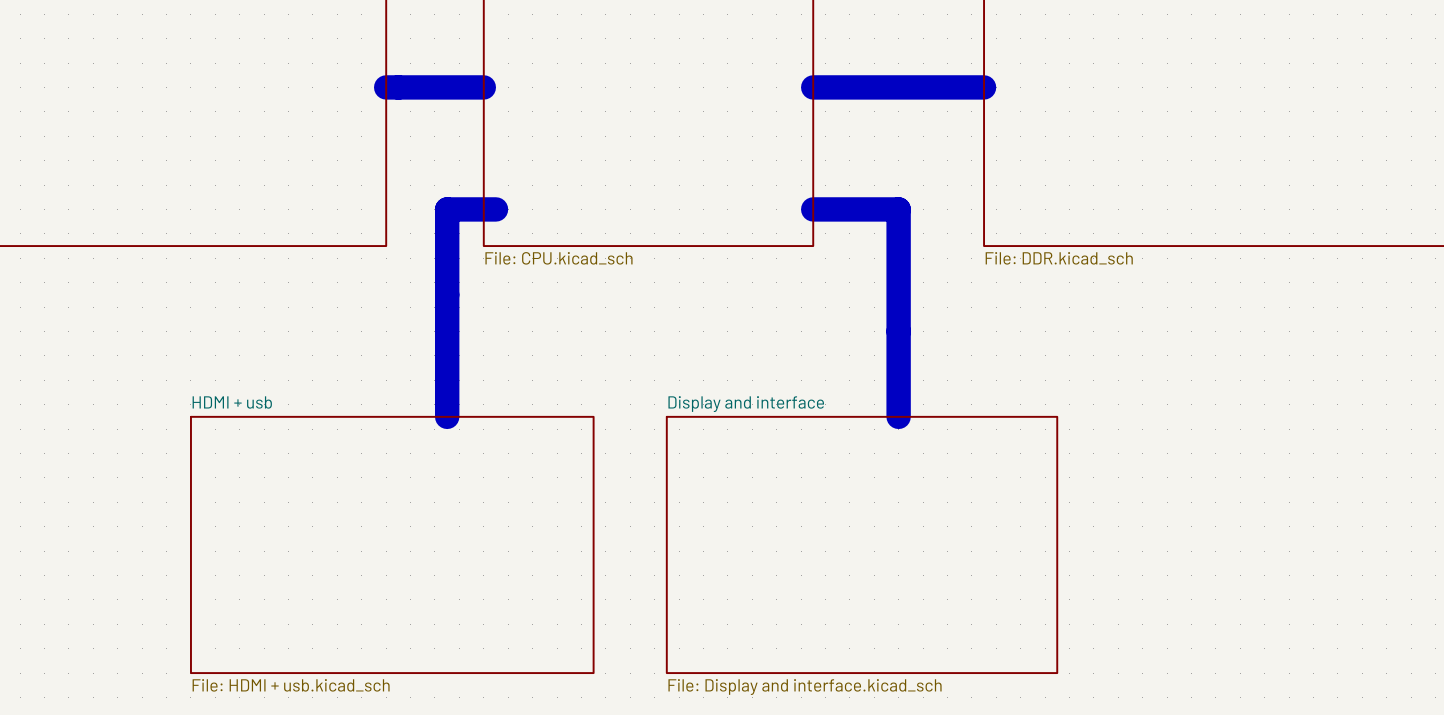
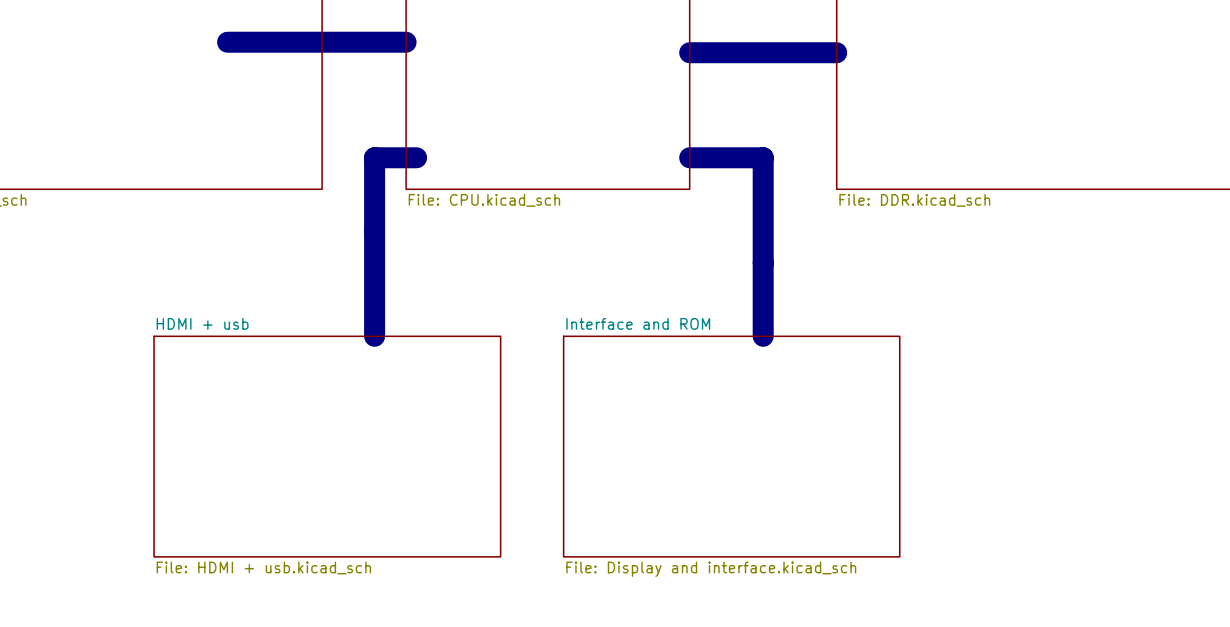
line: none -> (227, 42) (406, 42)
line: (386, 87) (483, 87) -> none
sheet Display and interface name: Display and interface (746, 404) -> Interface and ROM (638, 323)

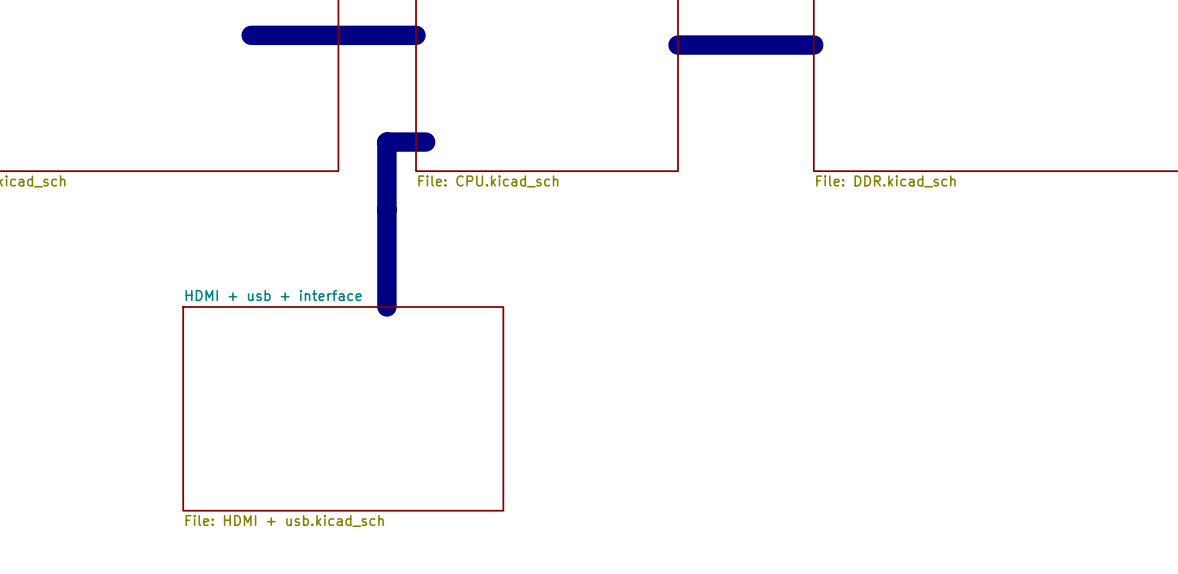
line: (689, 157) (763, 157) (763, 336) -> none
sheet HDMI + usb name: HDMI + usb (202, 323) -> HDMI + usb + interface (273, 295)
sheet Interface and ROM: File: Display and interface.kicad_sch (731, 446) -> none

